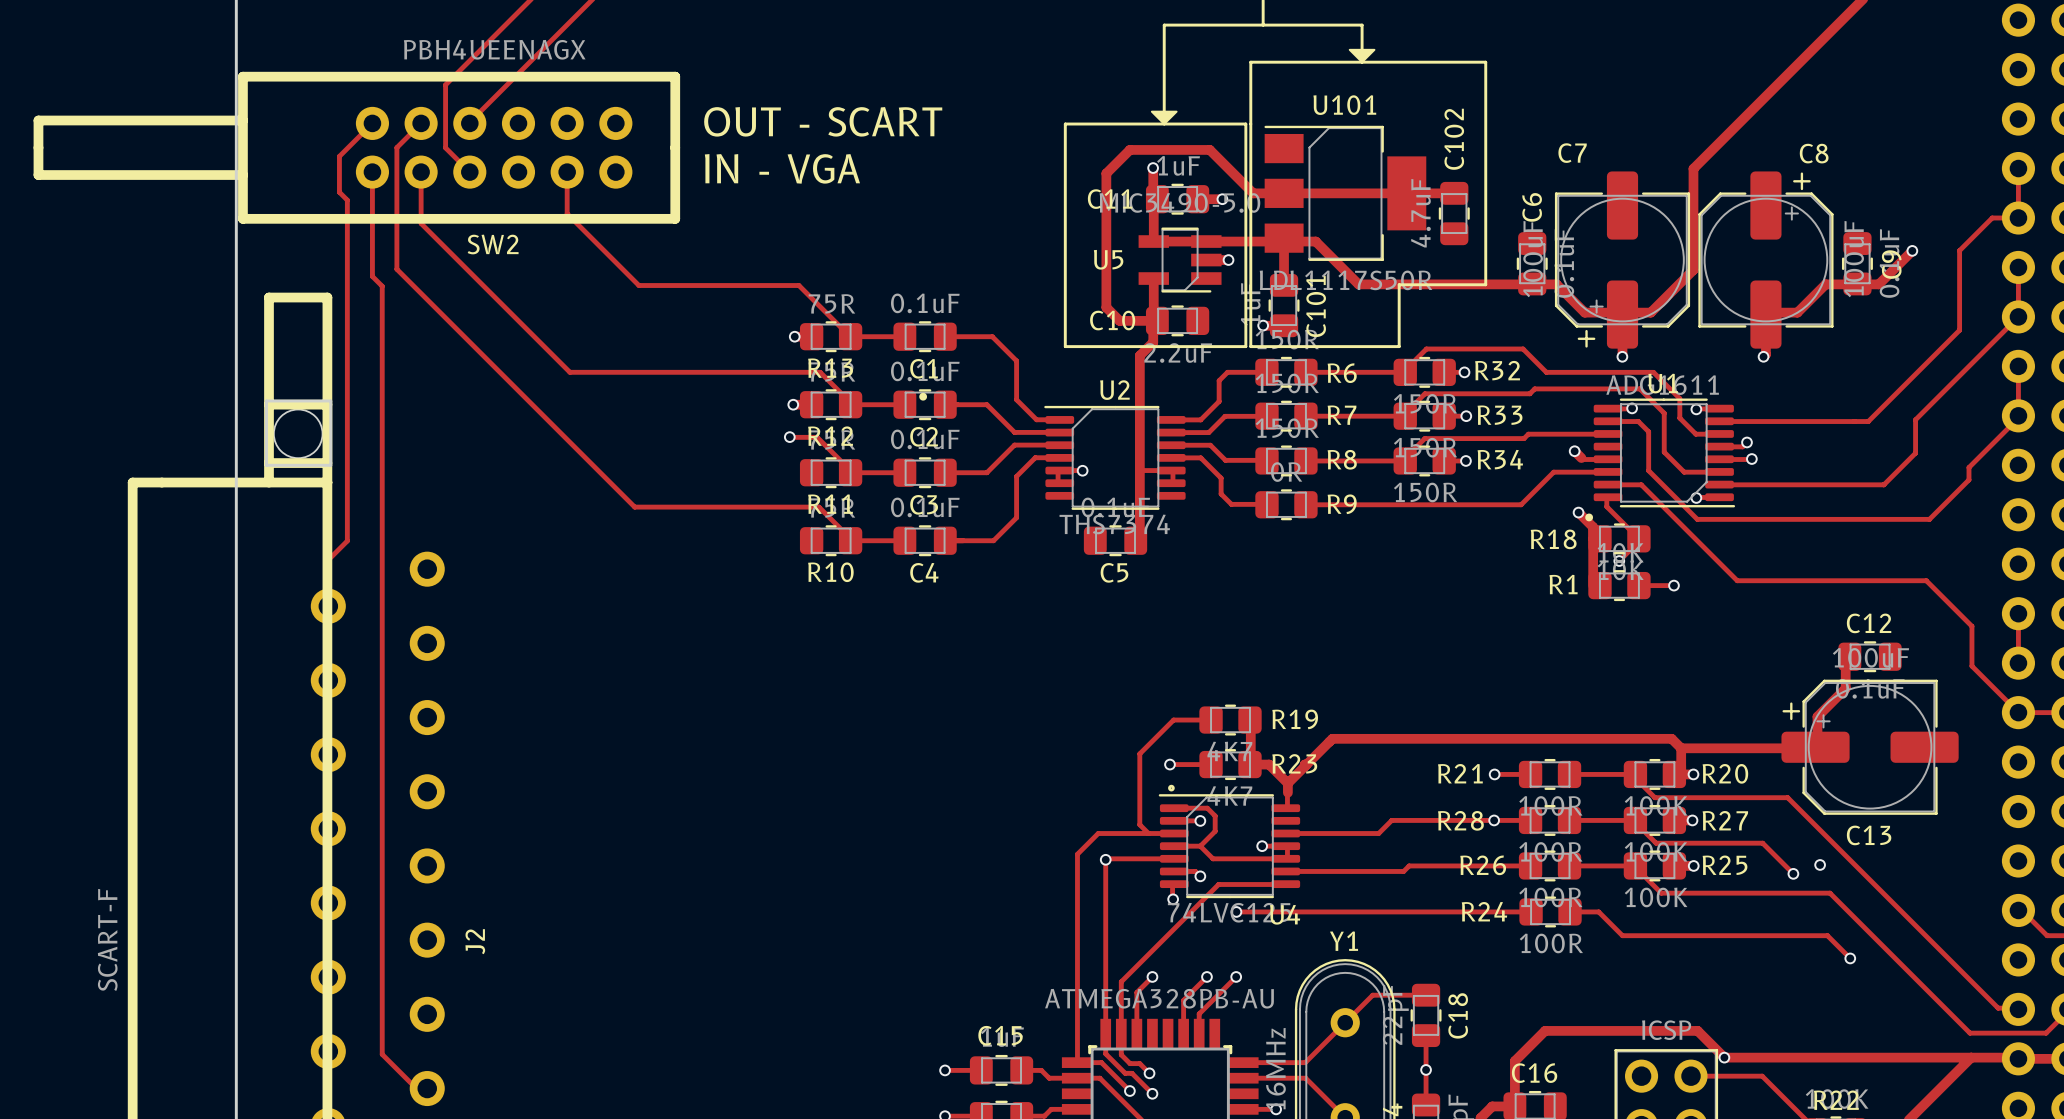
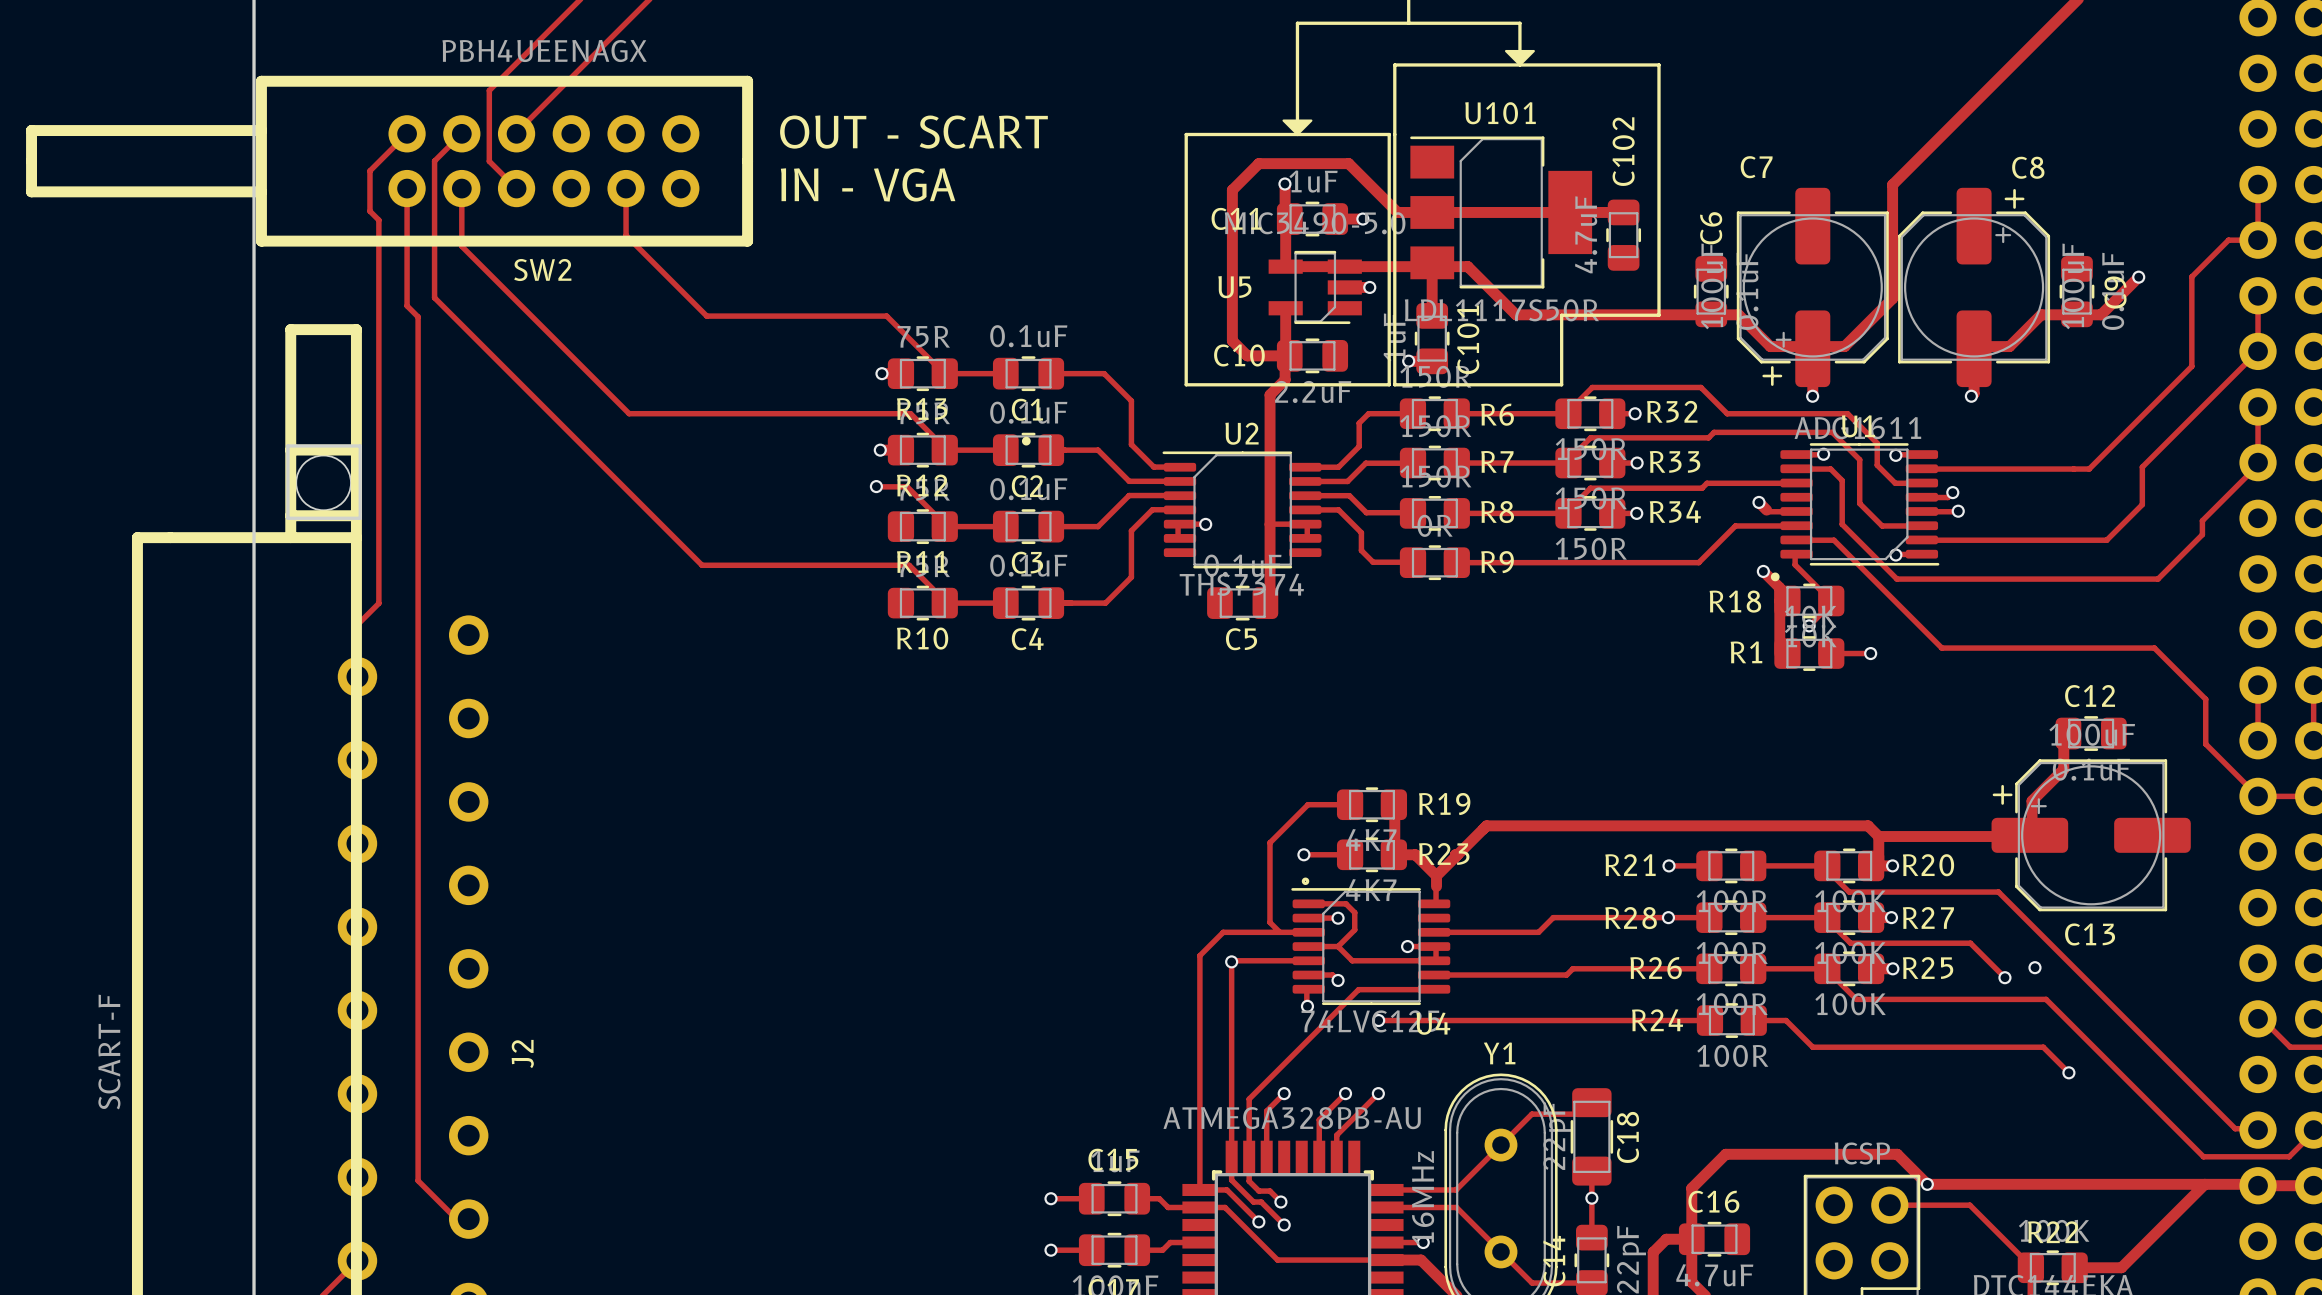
C18 footprint: [1410, 983, 1442, 1048] -> [1570, 1088, 1614, 1186]

